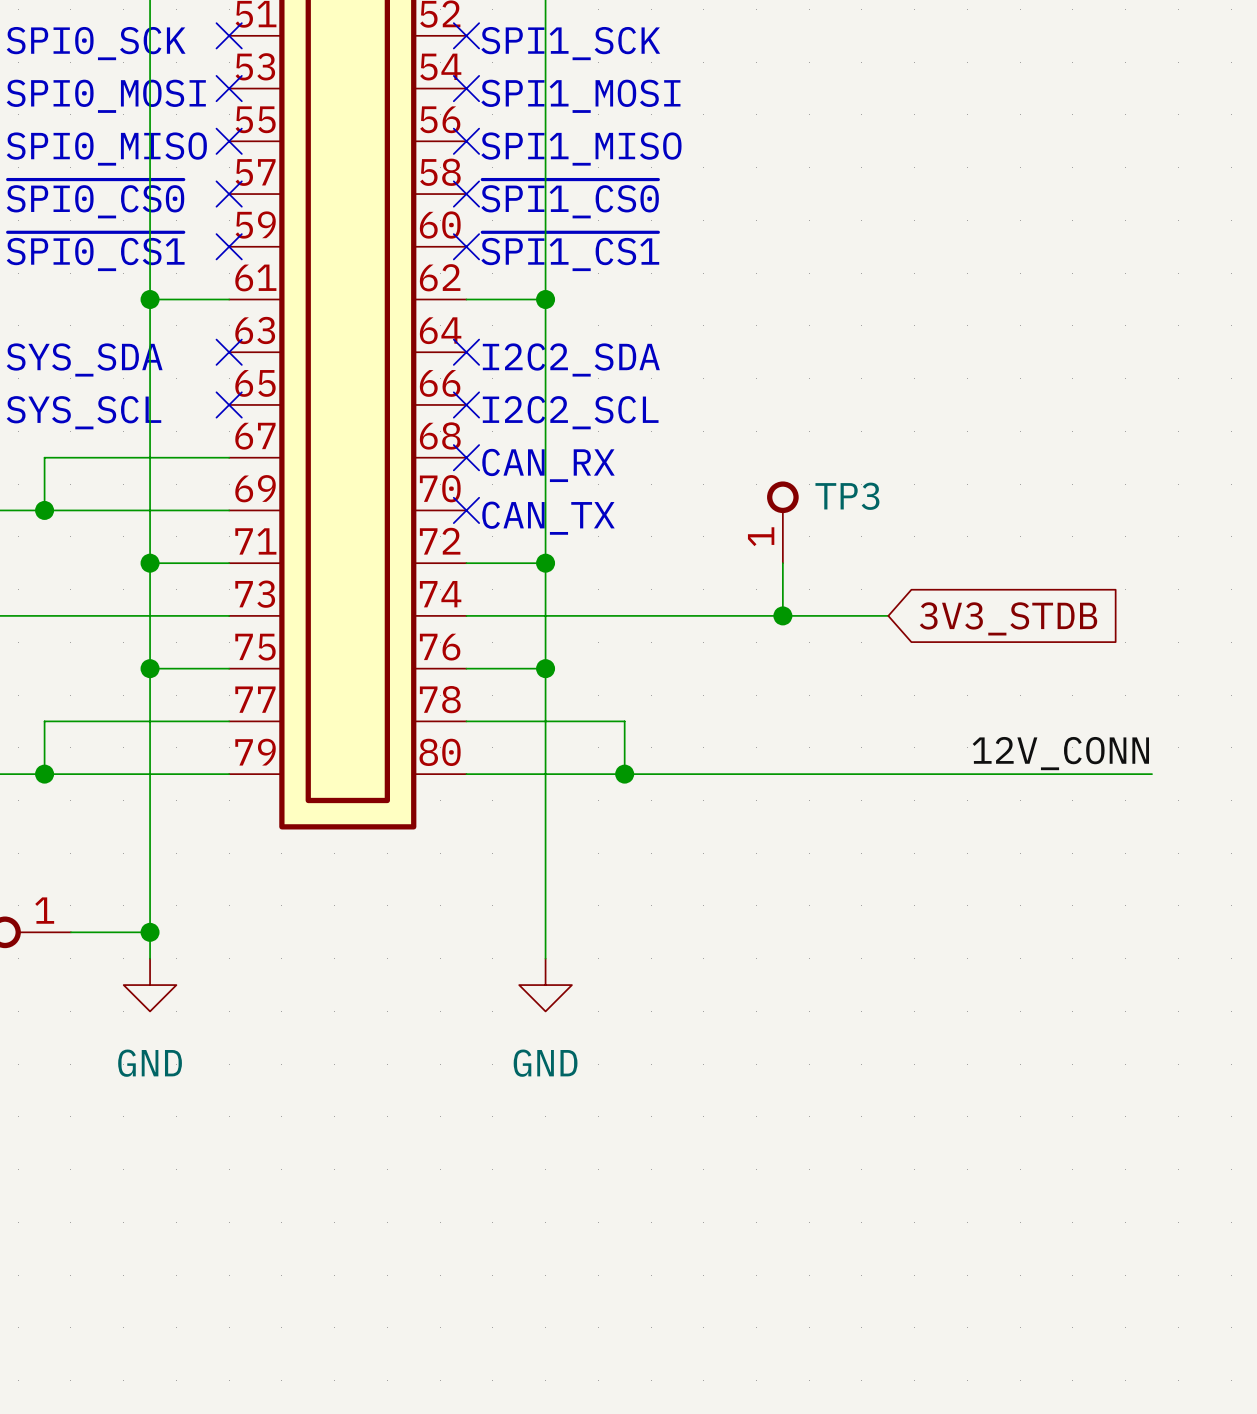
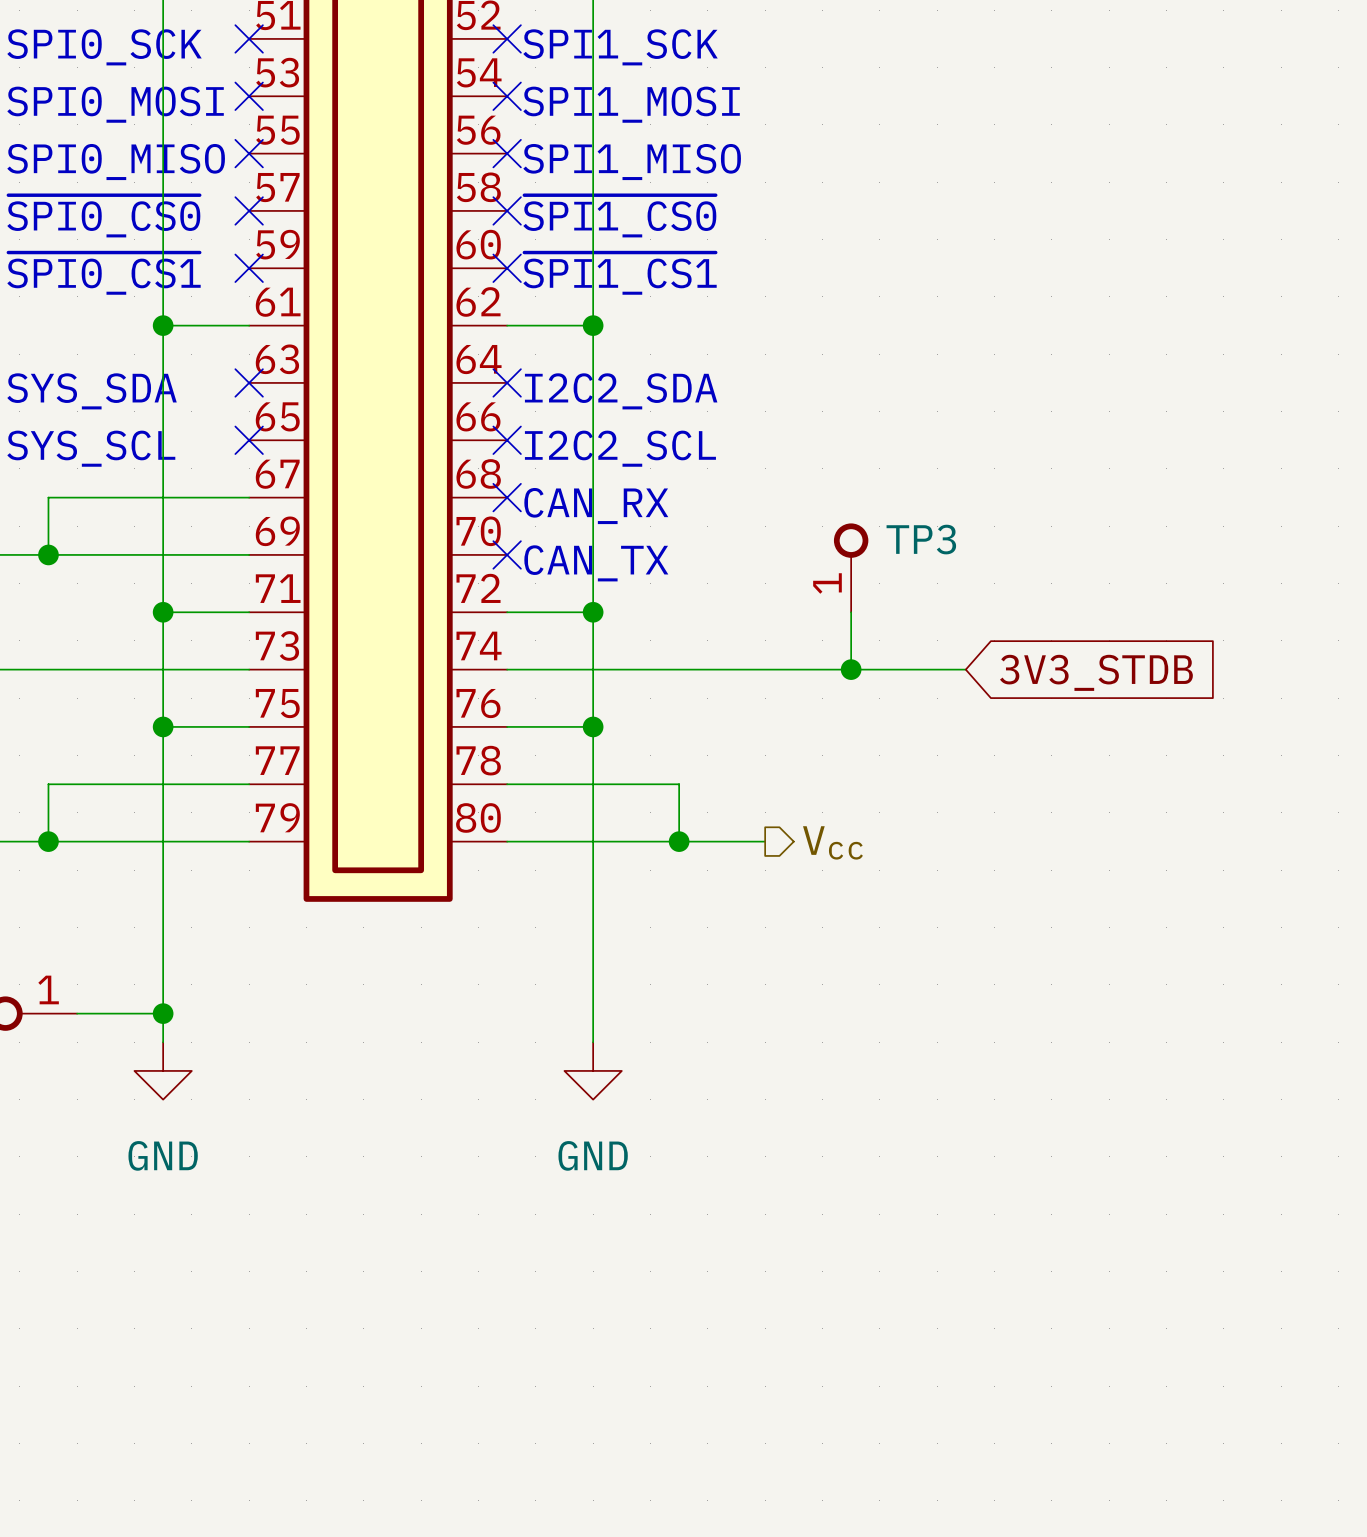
label: 12V_CONN (1060, 753) -> none
wire: (703, 774) (1152, 774) -> none
hierarchical label: none -> Vcc (832, 842)

